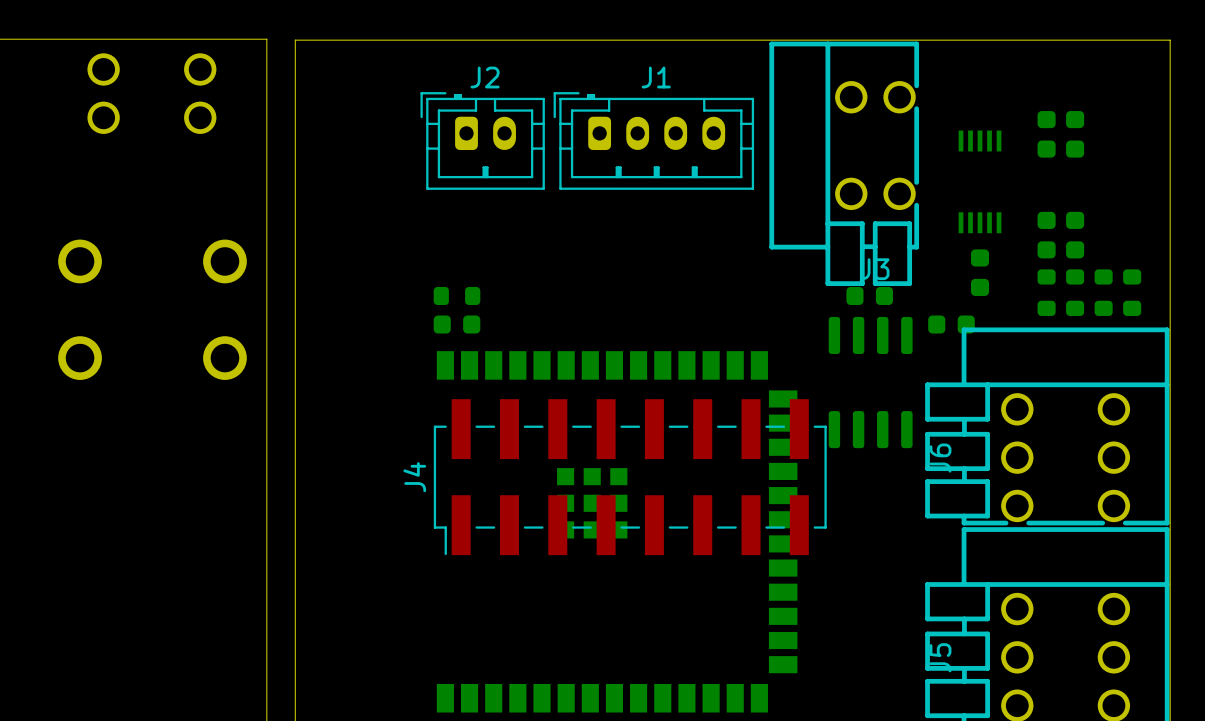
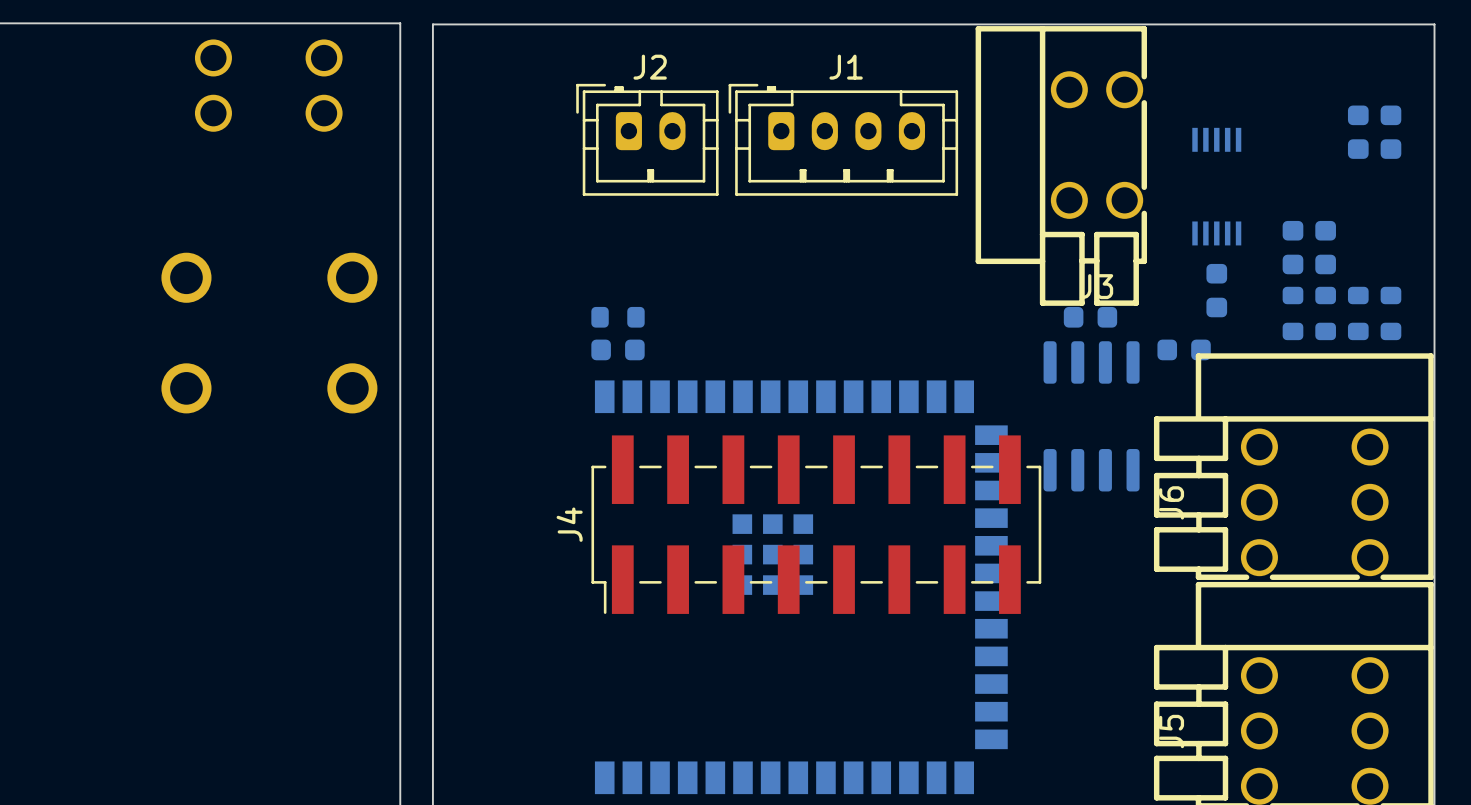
part: (1046, 134) -> none
part: (1075, 134) -> none
part: none -> (1358, 132)
part: none -> (1390, 132)

